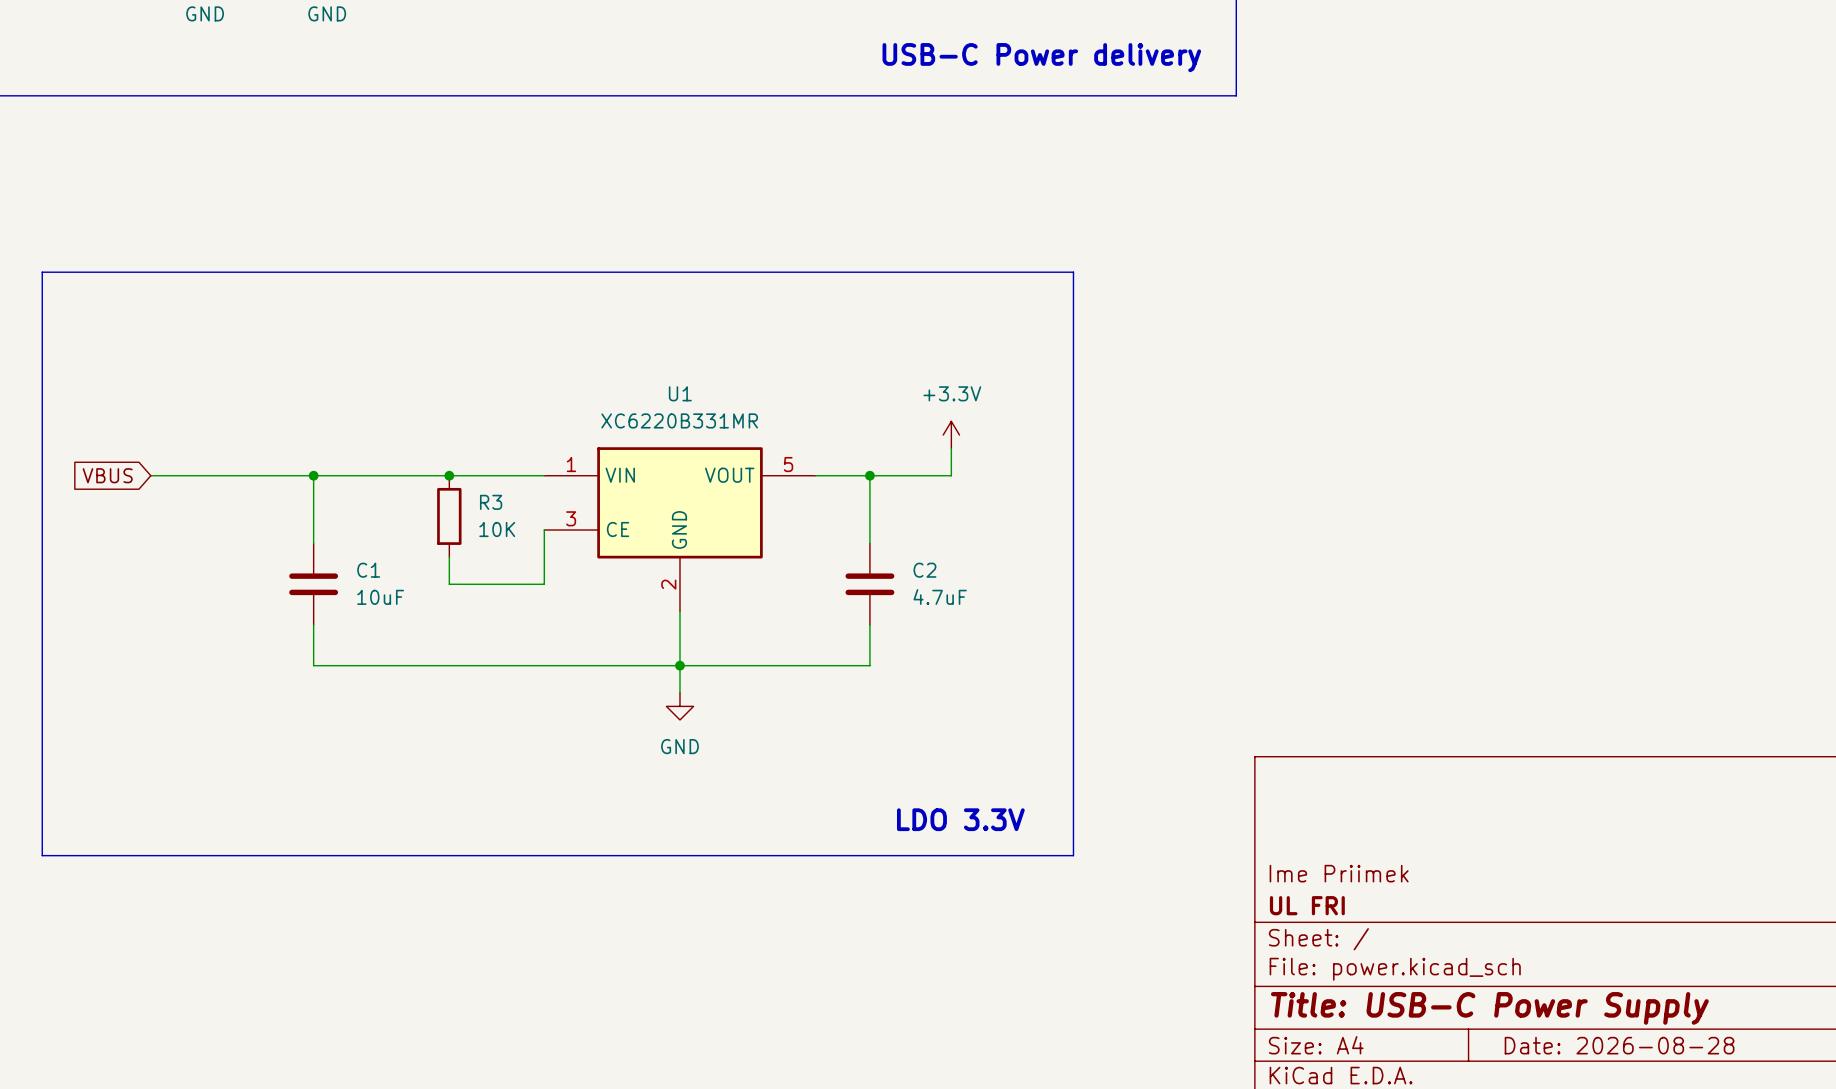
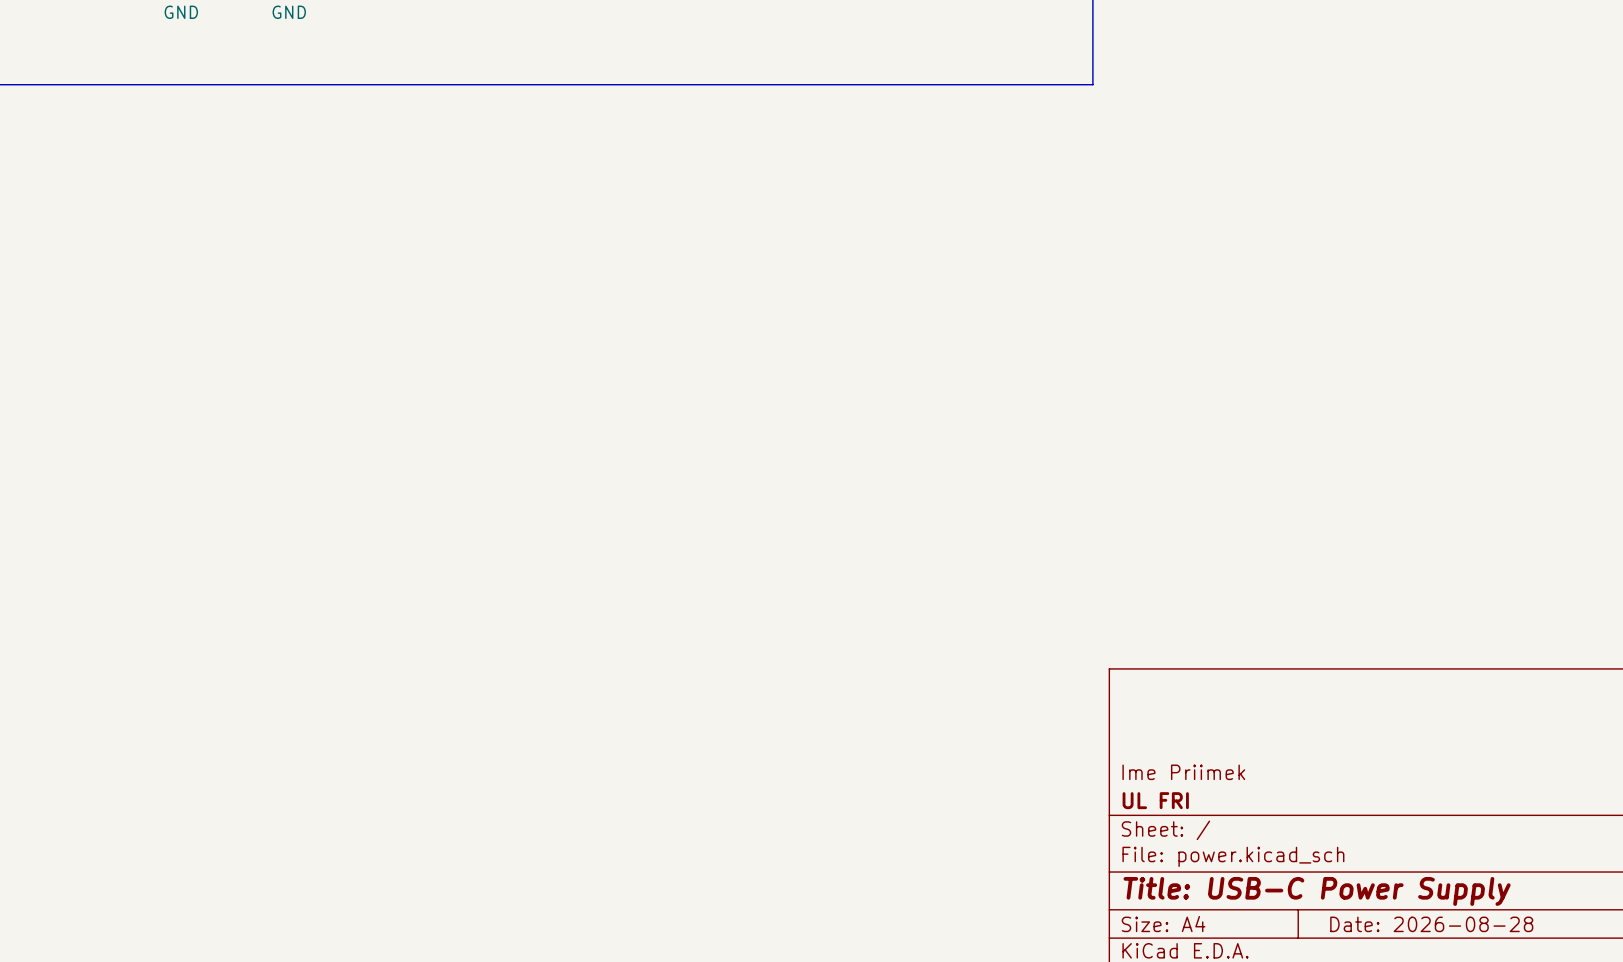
text: USB-C Power delivery (1041, 57) -> none
line: (42, 272) (1073, 272) (1073, 855) (42, 855) (42, 272) -> none
power symbol: +3.3V (951, 435) -> none
wire: (951, 448) (951, 475) (815, 475) -> none
global label: VBUS (107, 475) -> none
wire: (150, 475) (544, 475) -> none
wire: (313, 475) (313, 543) -> none
junction: (313, 475) -> none
junction: (449, 475) -> none
wire: (869, 475) (869, 543) -> none
junction: (869, 475) -> none
R3: 10K (449, 516) -> none
U1: XC6220B331MR (679, 529) -> none
wire: (544, 530) (544, 584) (449, 584) (449, 557) -> none
C1: 10uF (313, 584) -> none
C2: 4.7uF (869, 584) -> none
wire: (679, 611) (679, 692) -> none
wire: (313, 624) (313, 665) (869, 665) (869, 624) -> none
junction: (679, 665) -> none
power symbol: GND (679, 706) -> none
text: LDO 3.3V (960, 819) -> none

